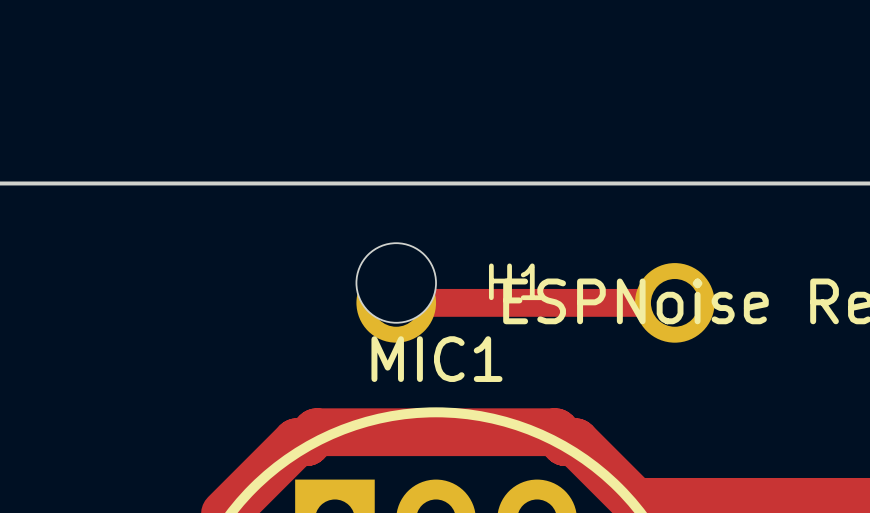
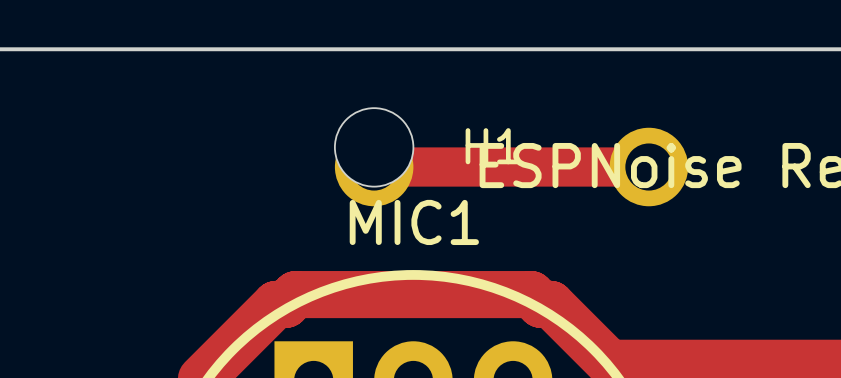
track width: thin (396, 302) (674, 302) -> thick (374, 167) (648, 167)

